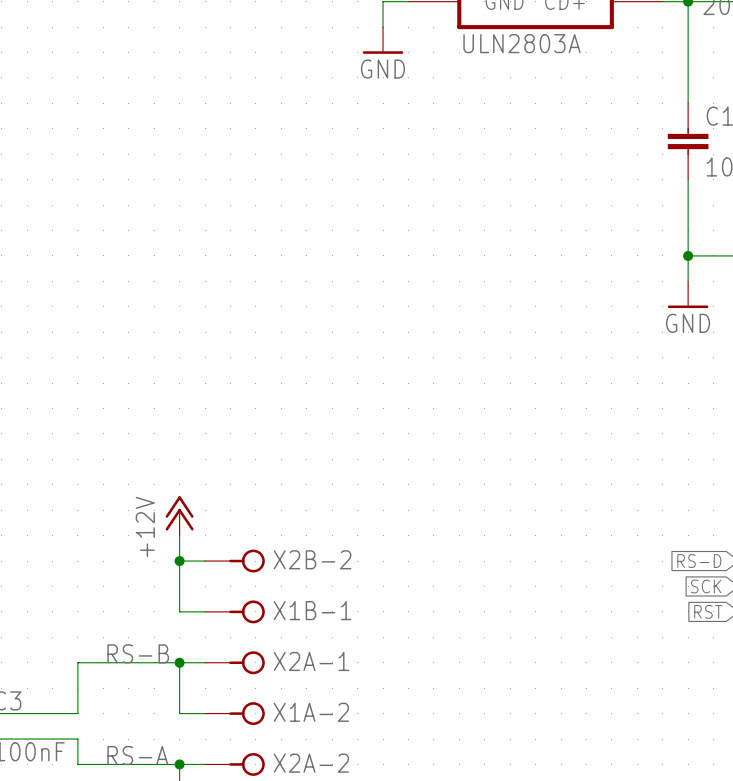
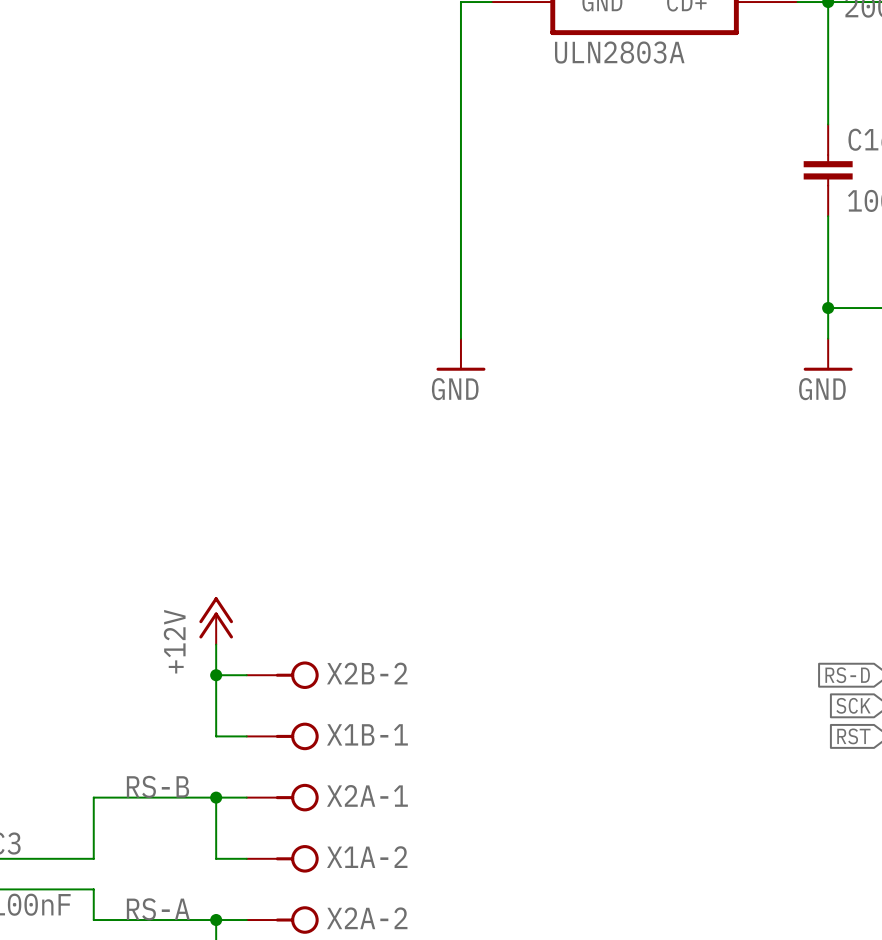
wire: none -> (460, 32) (460, 338)
power symbol: GND (383, 40) -> none
power symbol: none -> GND (460, 354)

